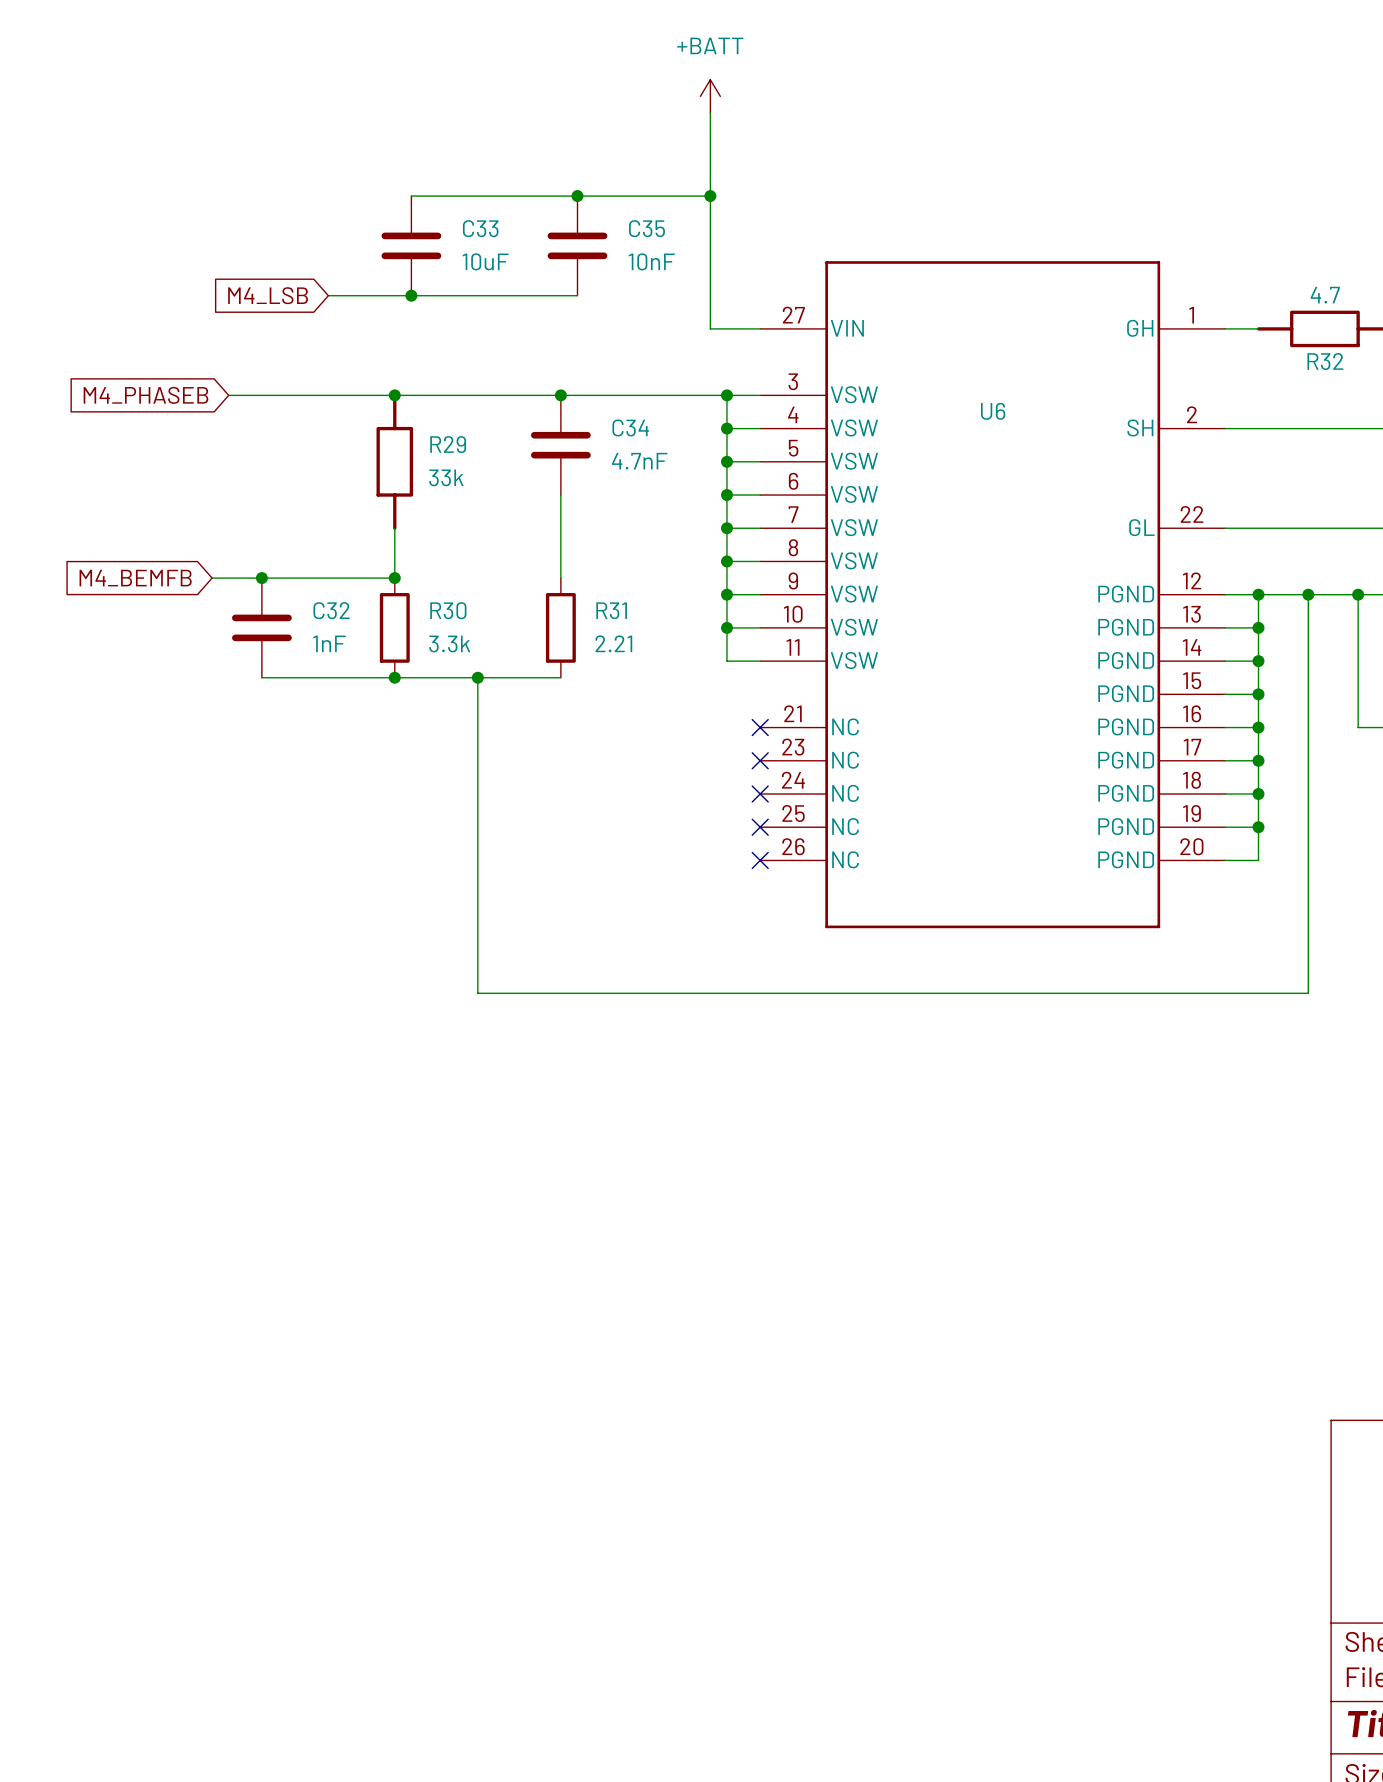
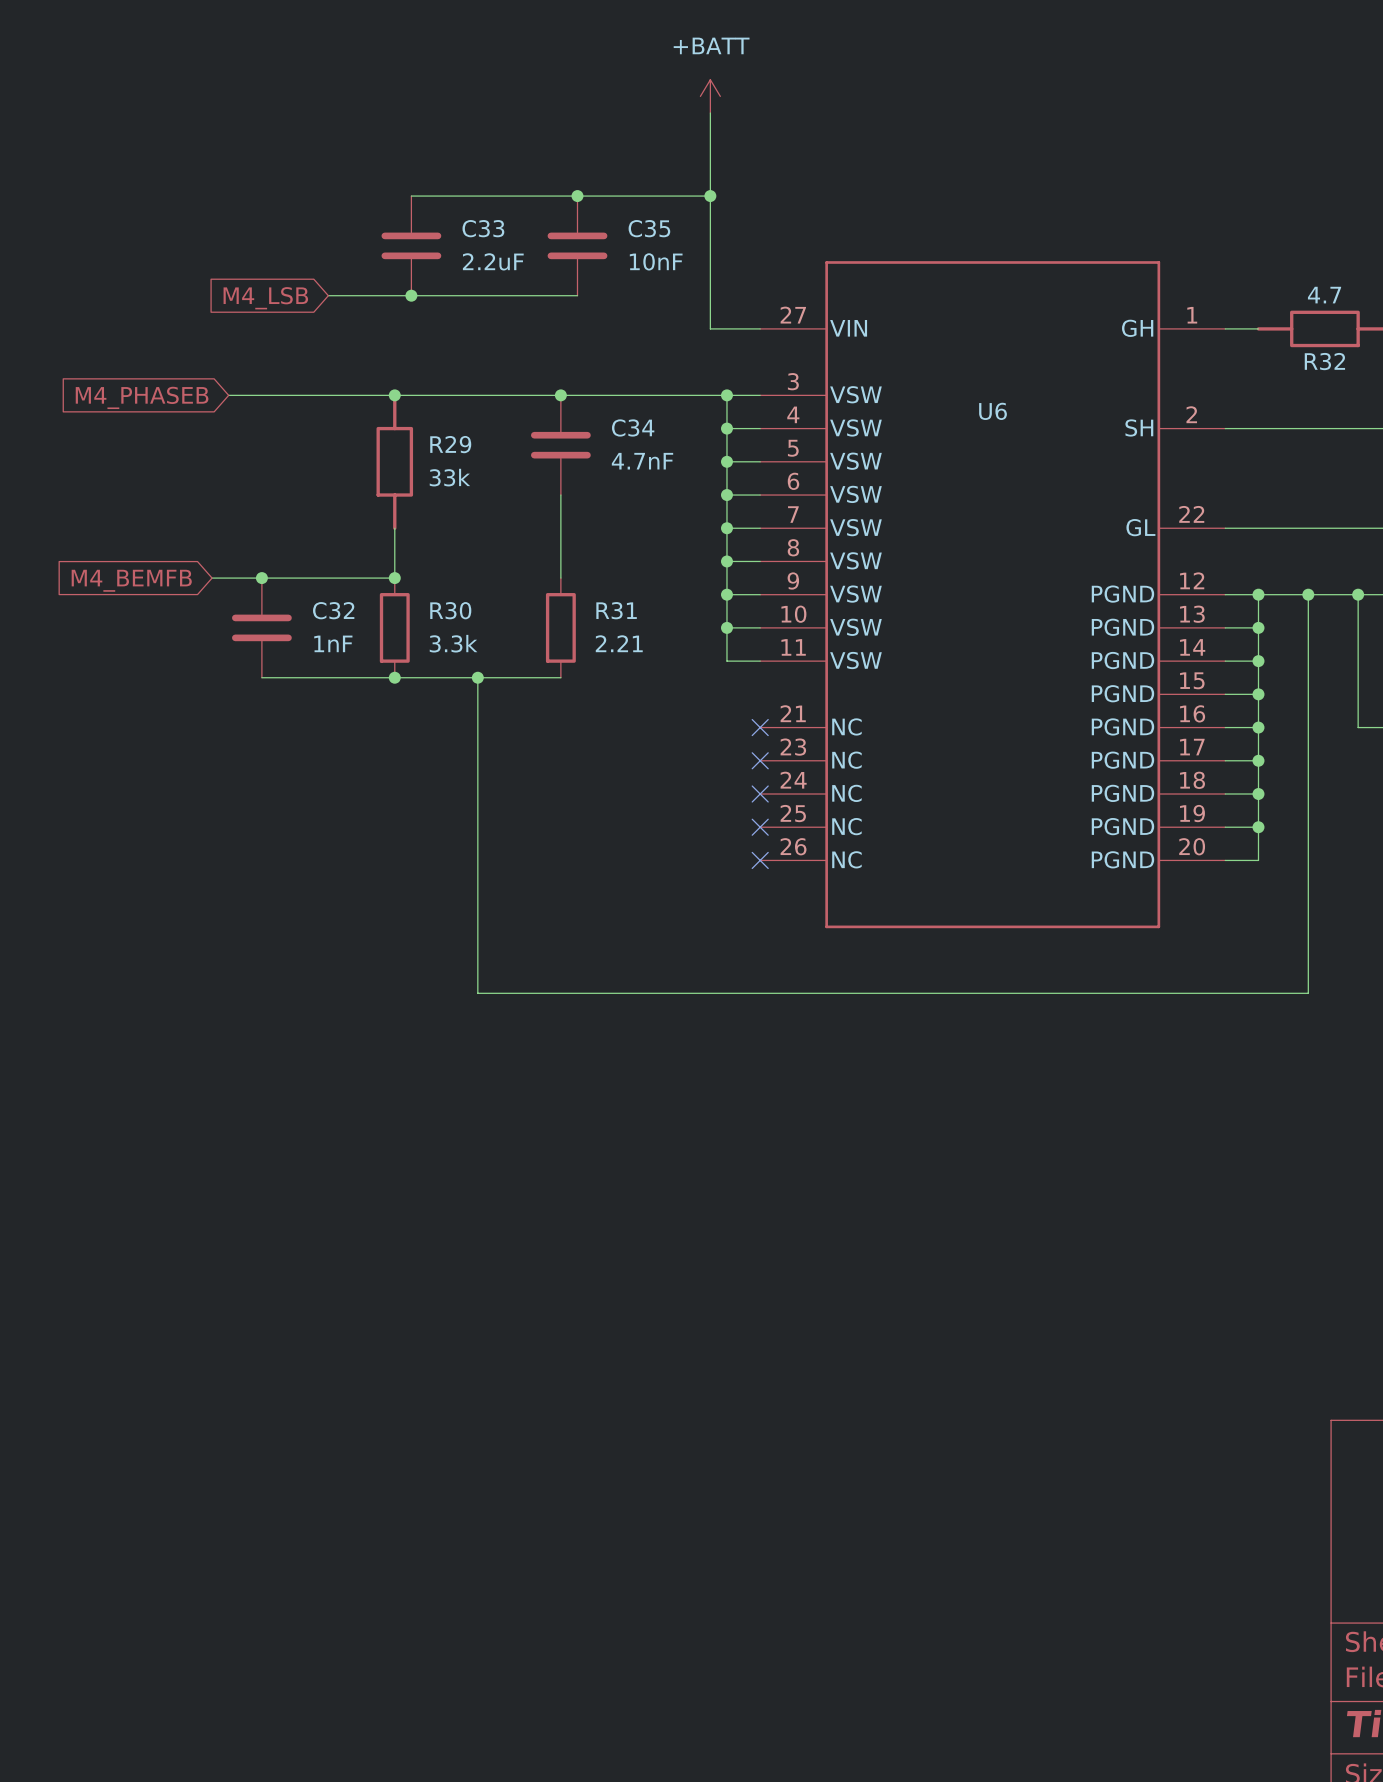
C33 value: 10uF (485, 261) -> 2.2uF (493, 261)

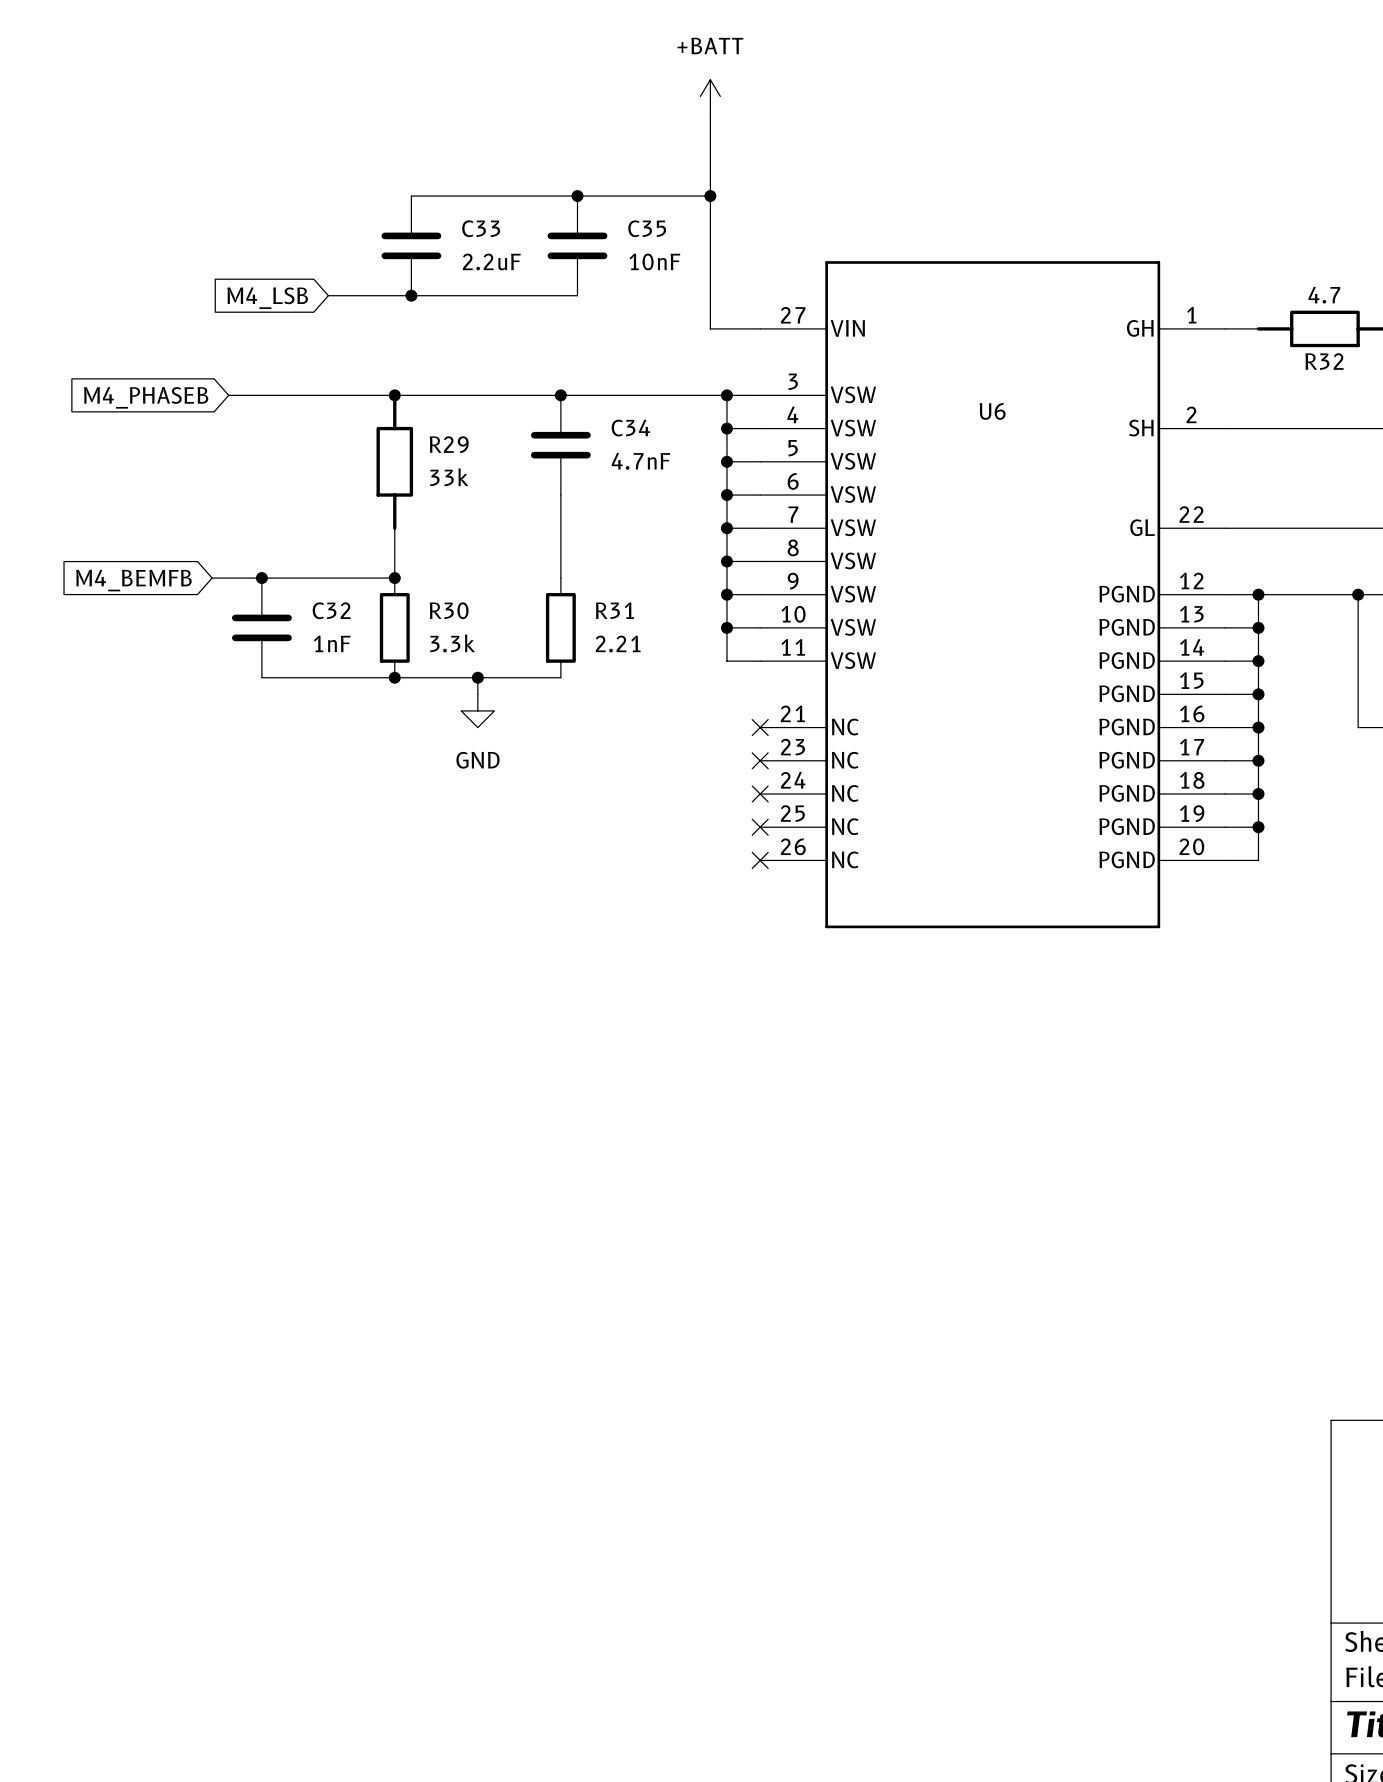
wire: (1308, 594) (1308, 993) (477, 993) (477, 694) -> none
junction: (1308, 594) -> none
power symbol: none -> GND (477, 710)

